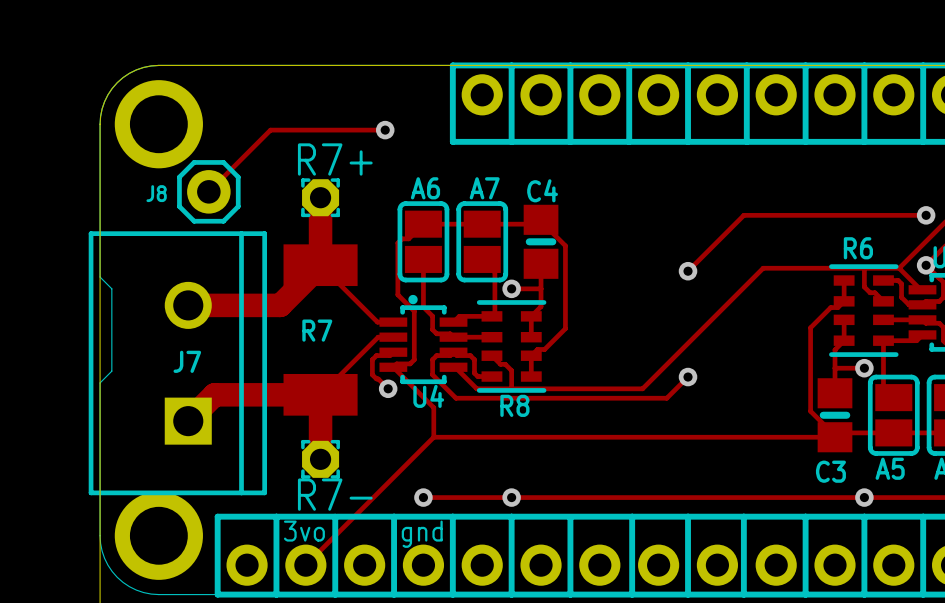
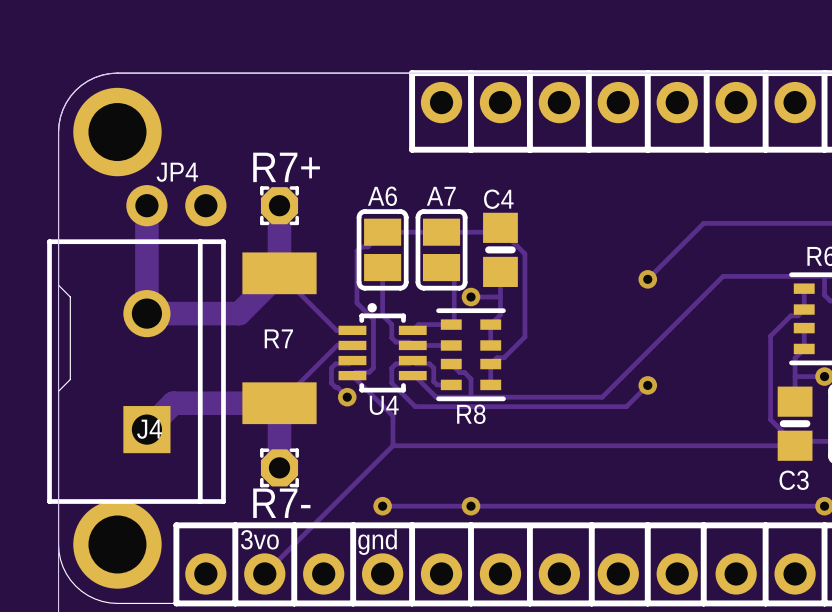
track: (385, 130) (270, 130) (208, 191) -> none
via: (385, 130) -> none
J8: (208, 191) -> none
track: none -> (146, 205) (146, 313)
JP4: none -> (176, 205)
J7 name: J7 (187, 361) -> J4 (149, 429)

